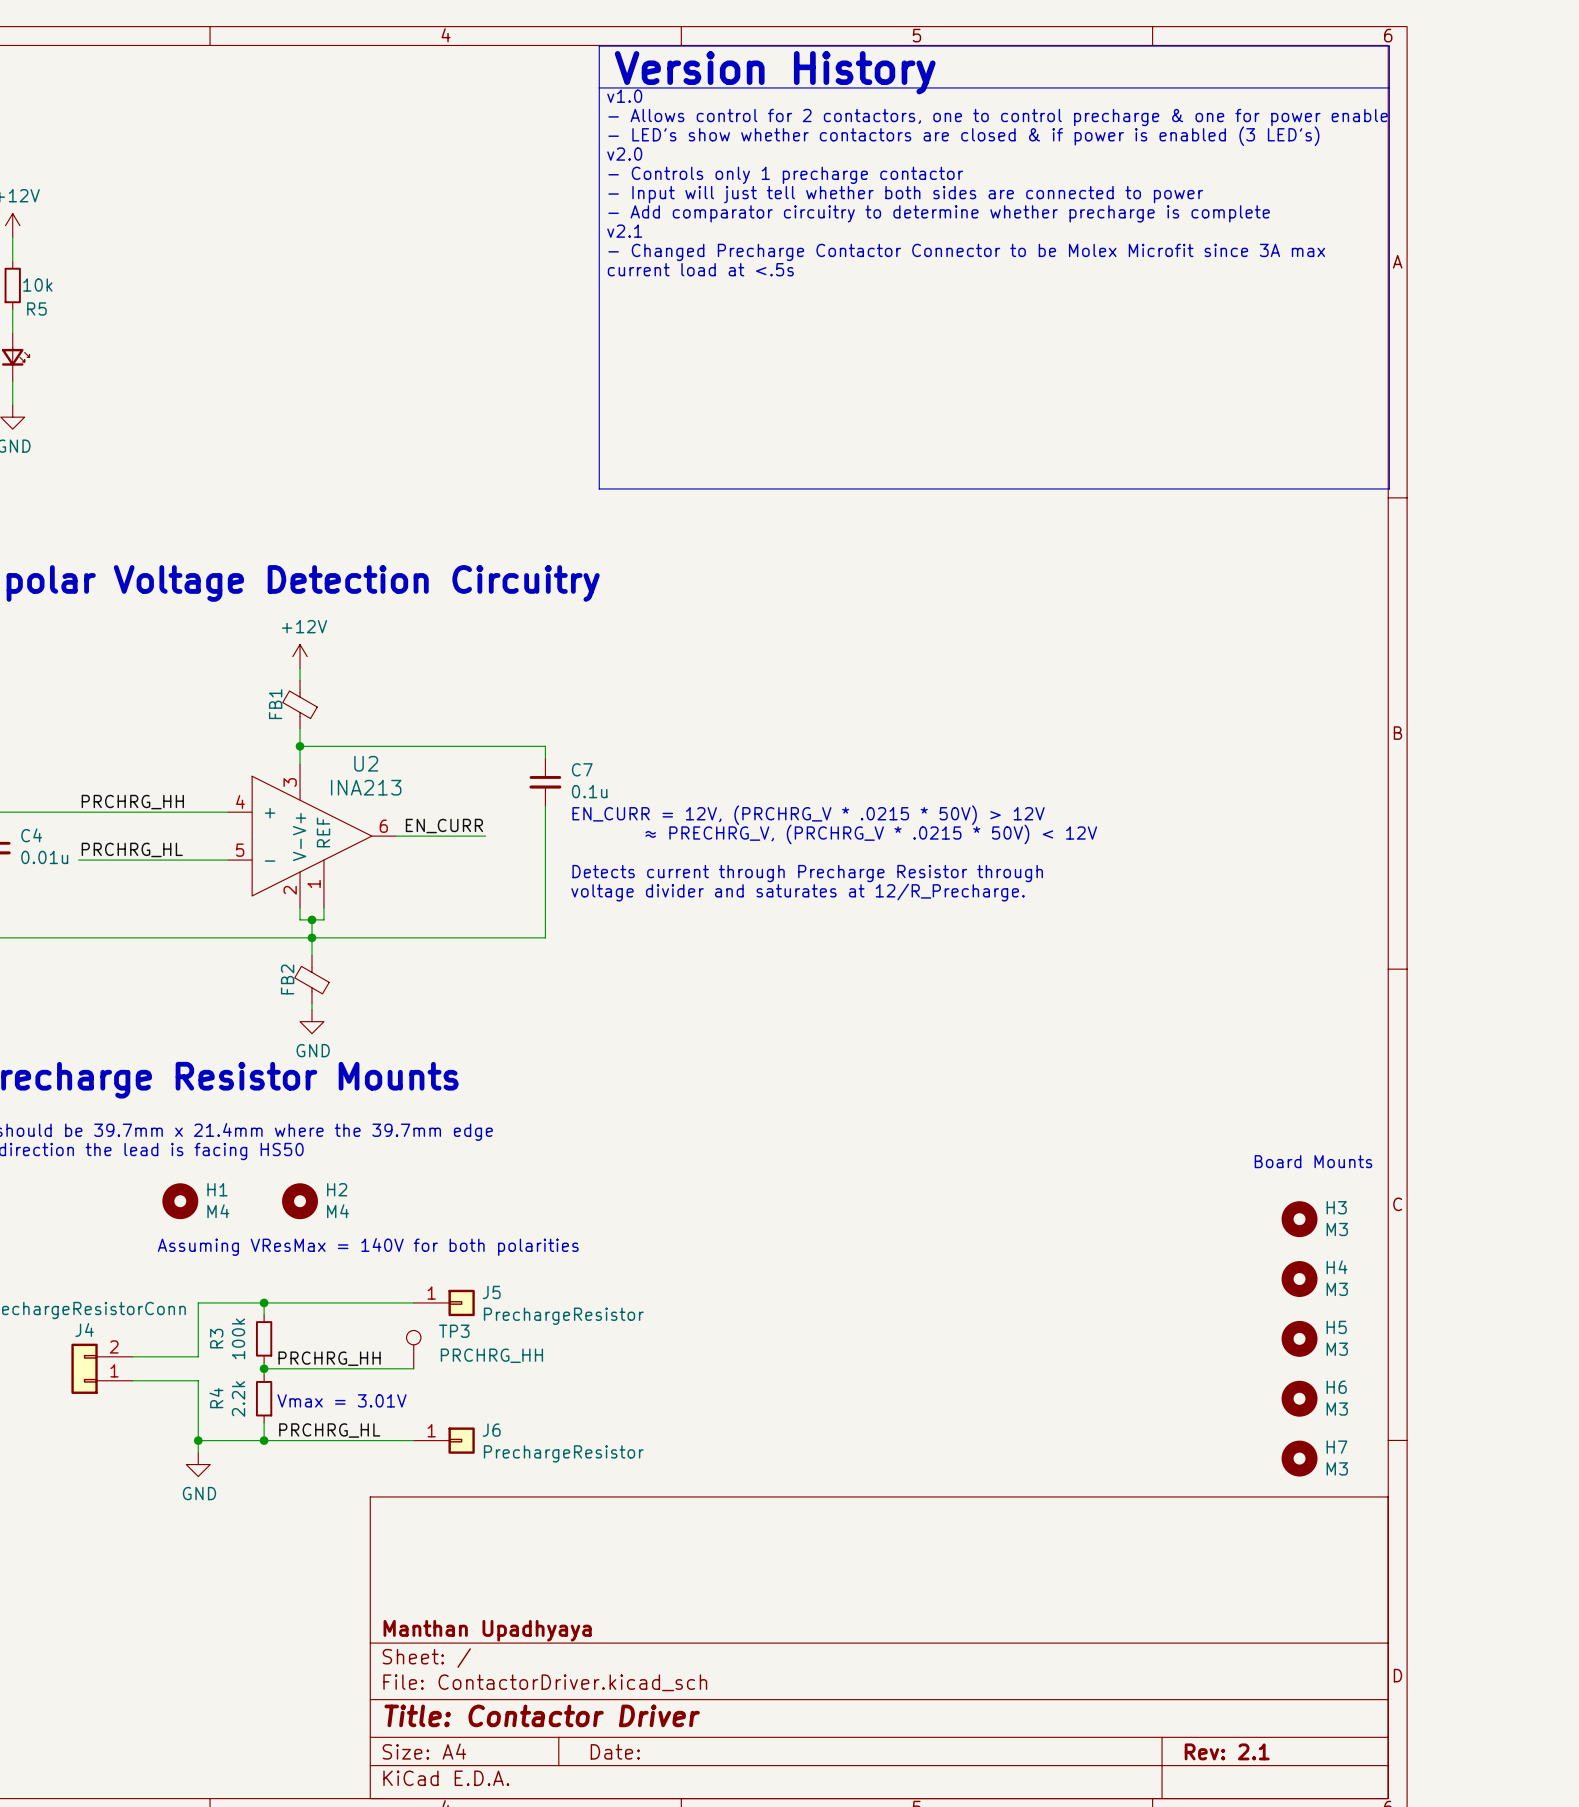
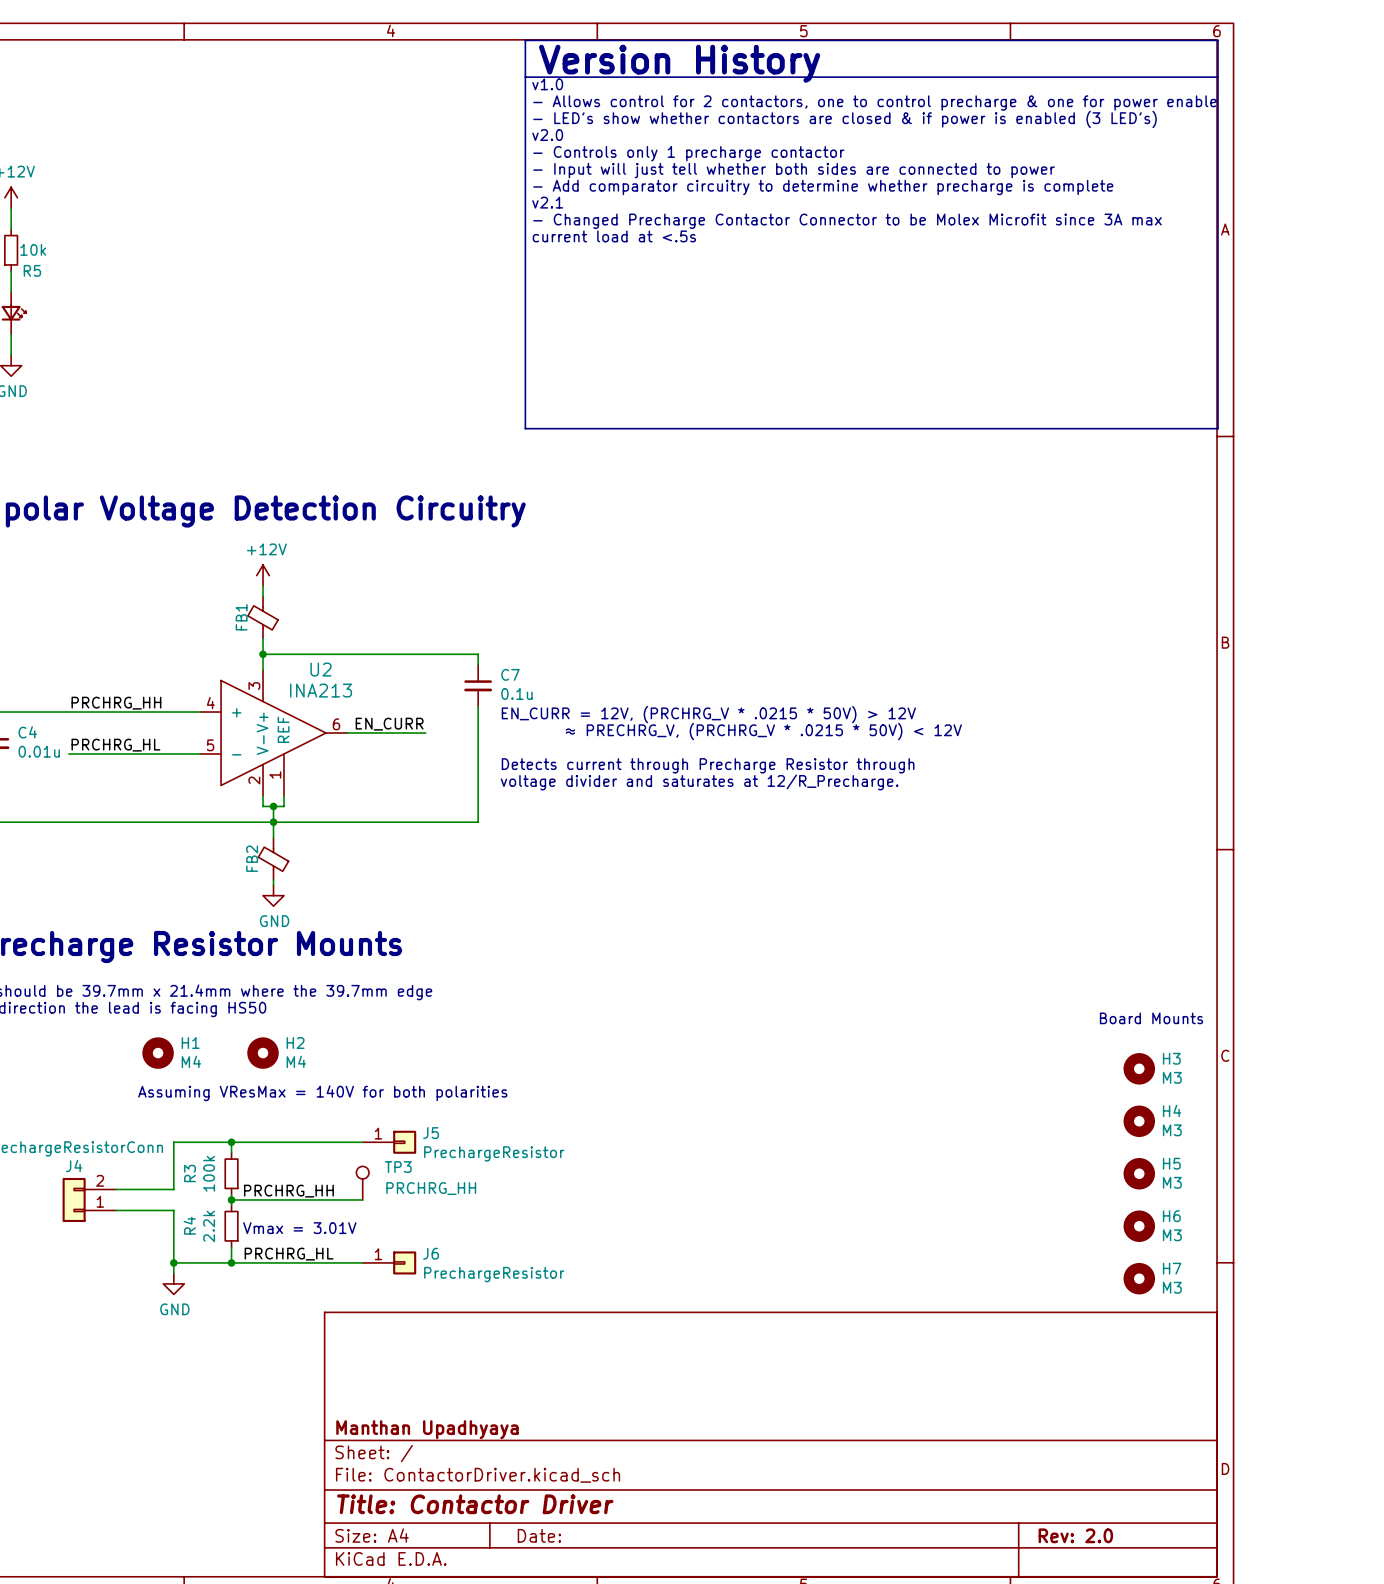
title block: Rev: 2.1 (1227, 1751) -> Rev: 2.0 (1075, 1535)

